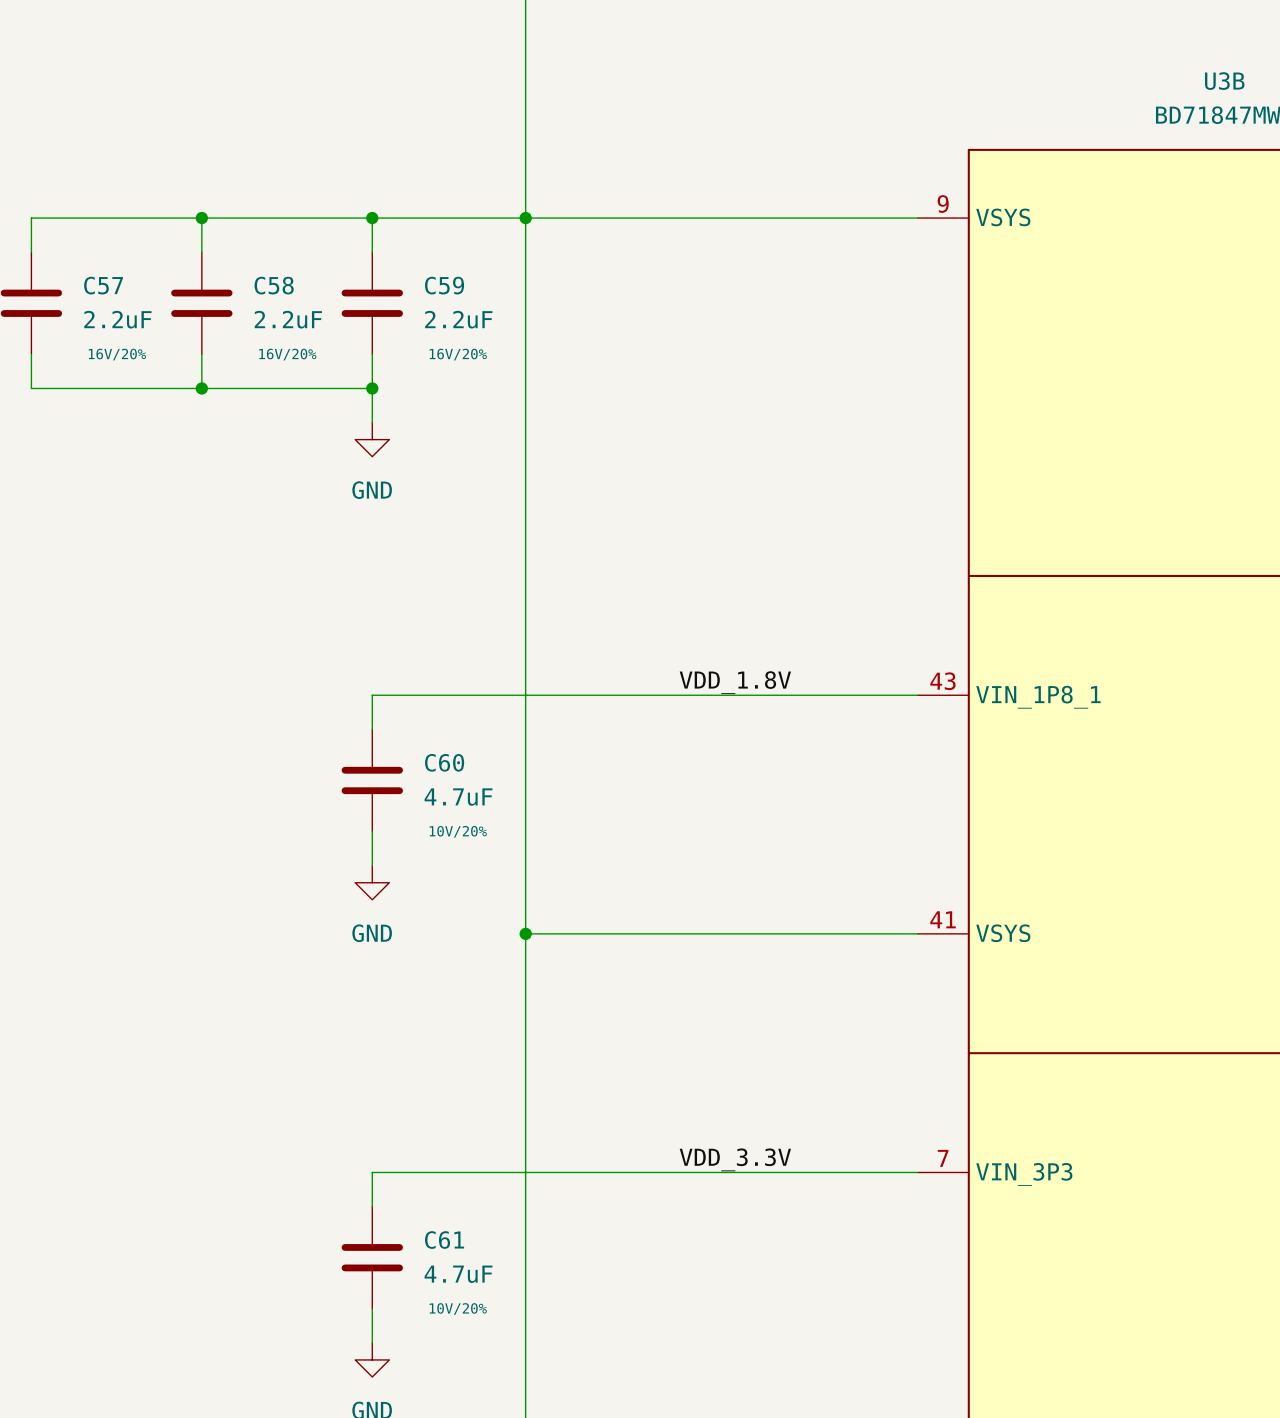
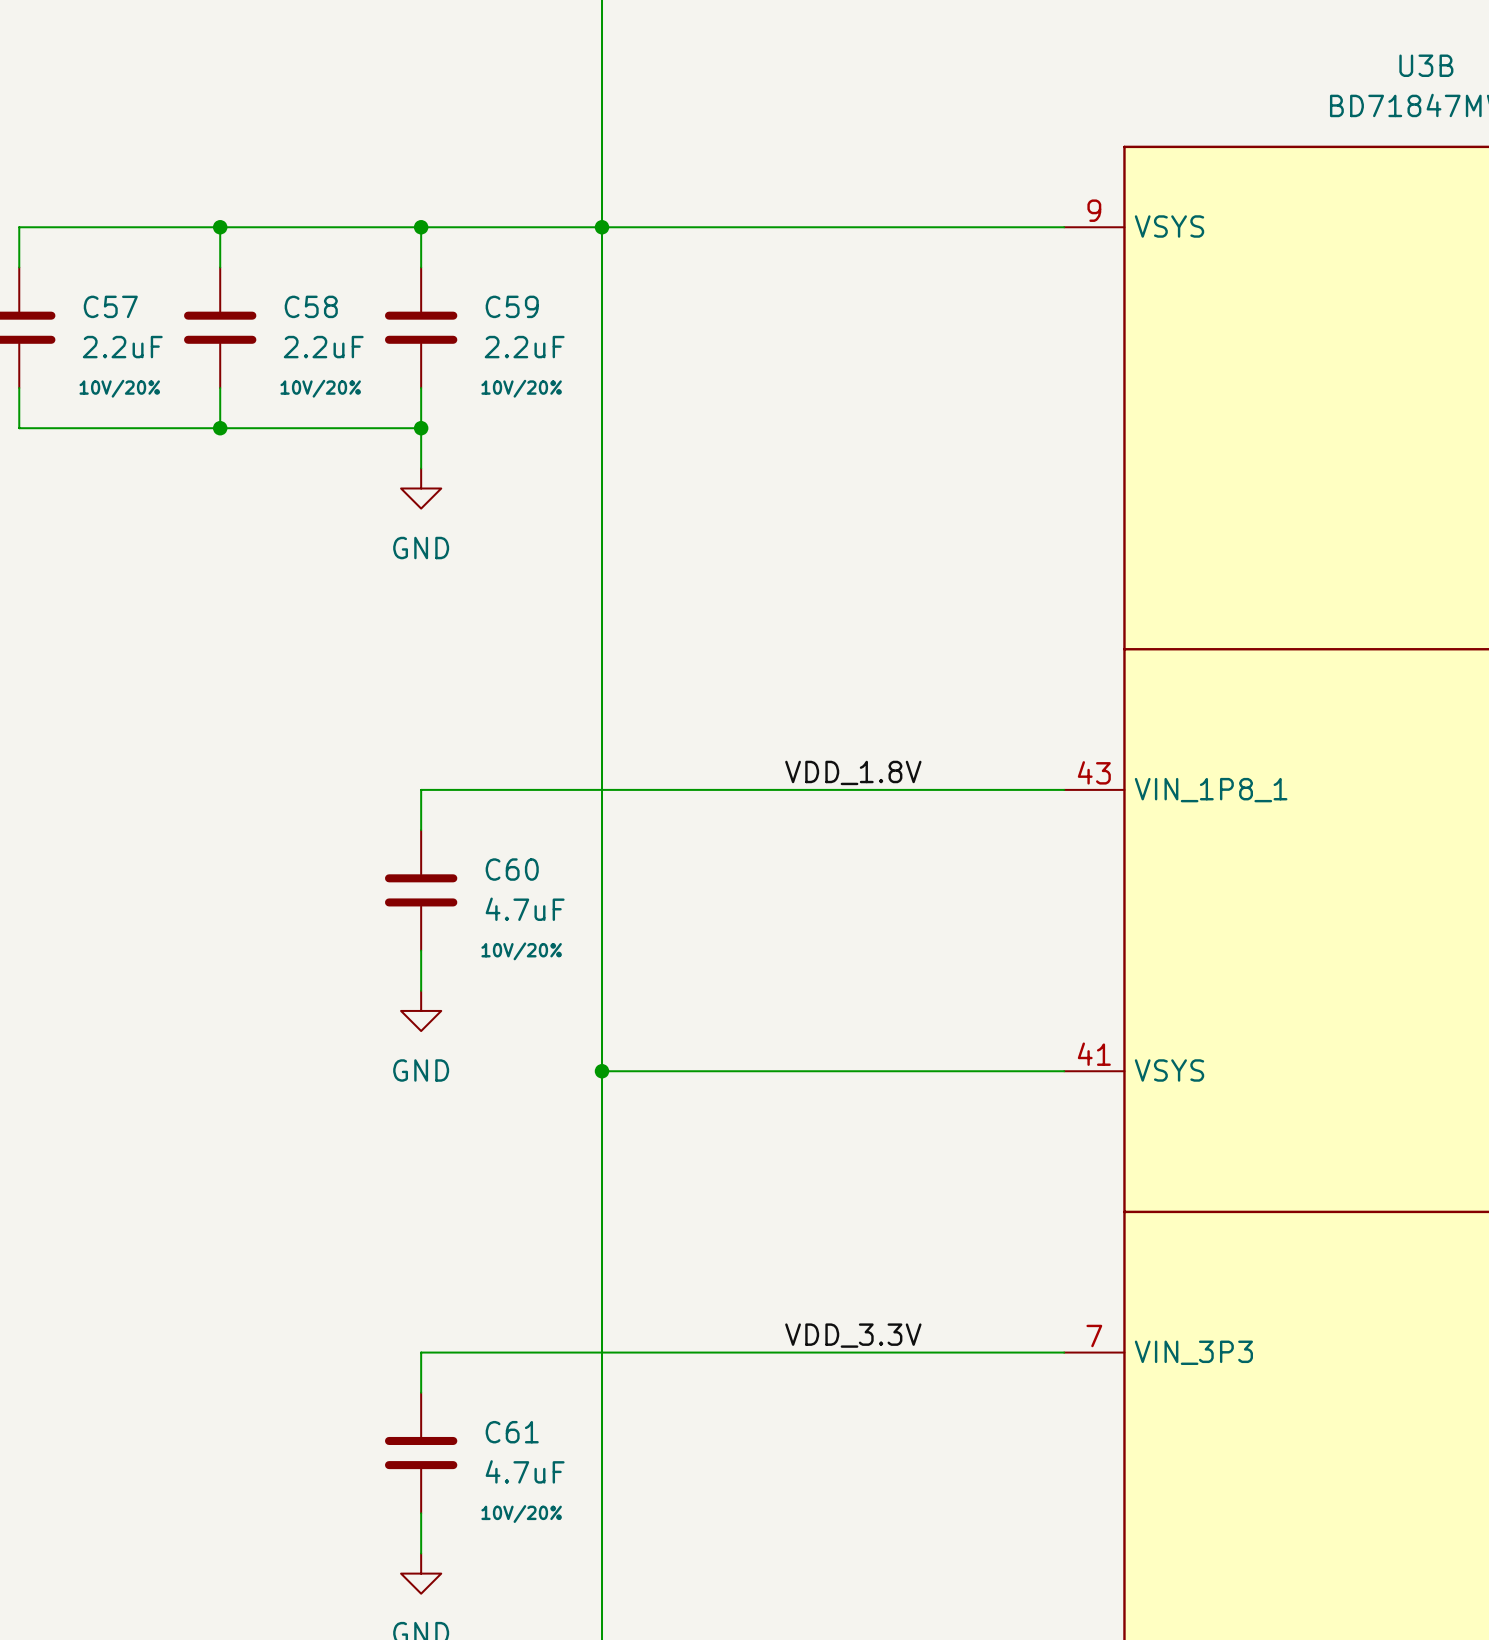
C57 text: 16V/20% (117, 354) -> 10V/20% (119, 388)
C58 text: 16V/20% (287, 354) -> 10V/20% (320, 388)
C59 text: 16V/20% (458, 354) -> 10V/20% (521, 388)

